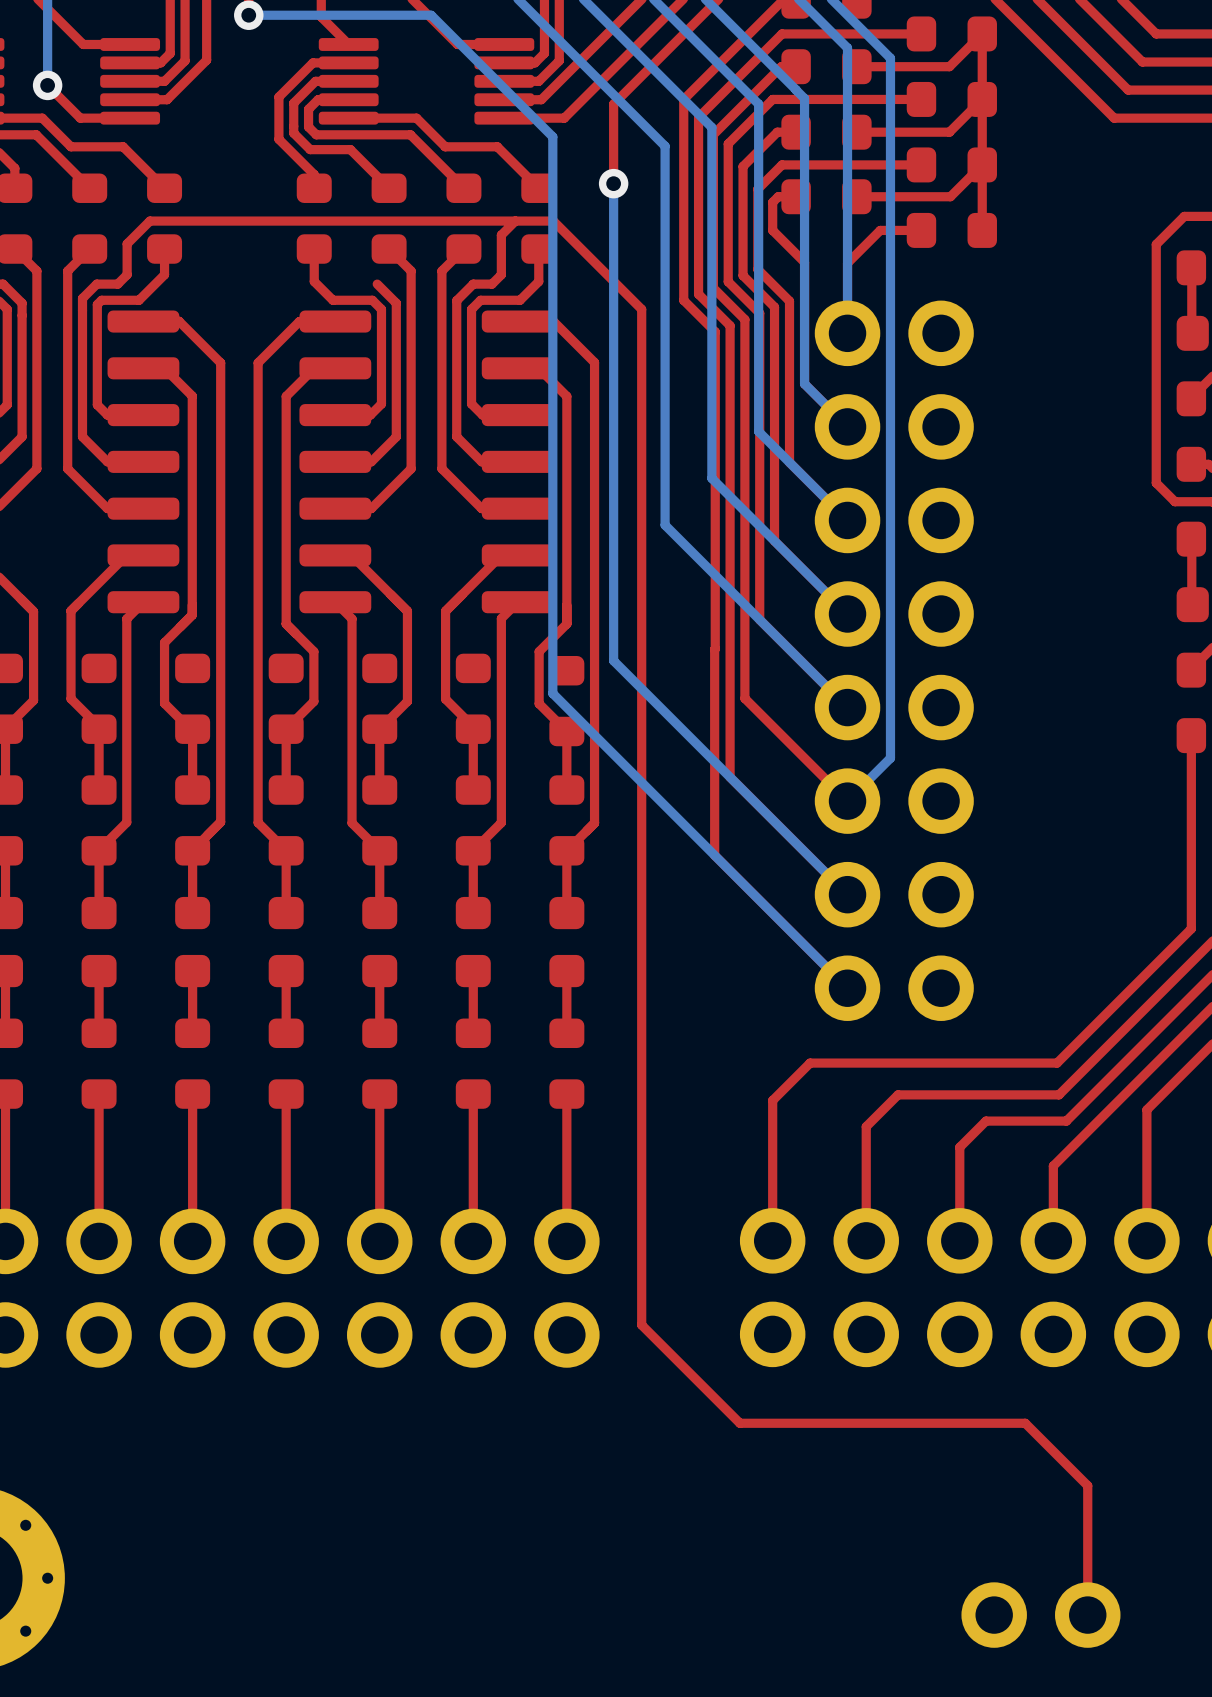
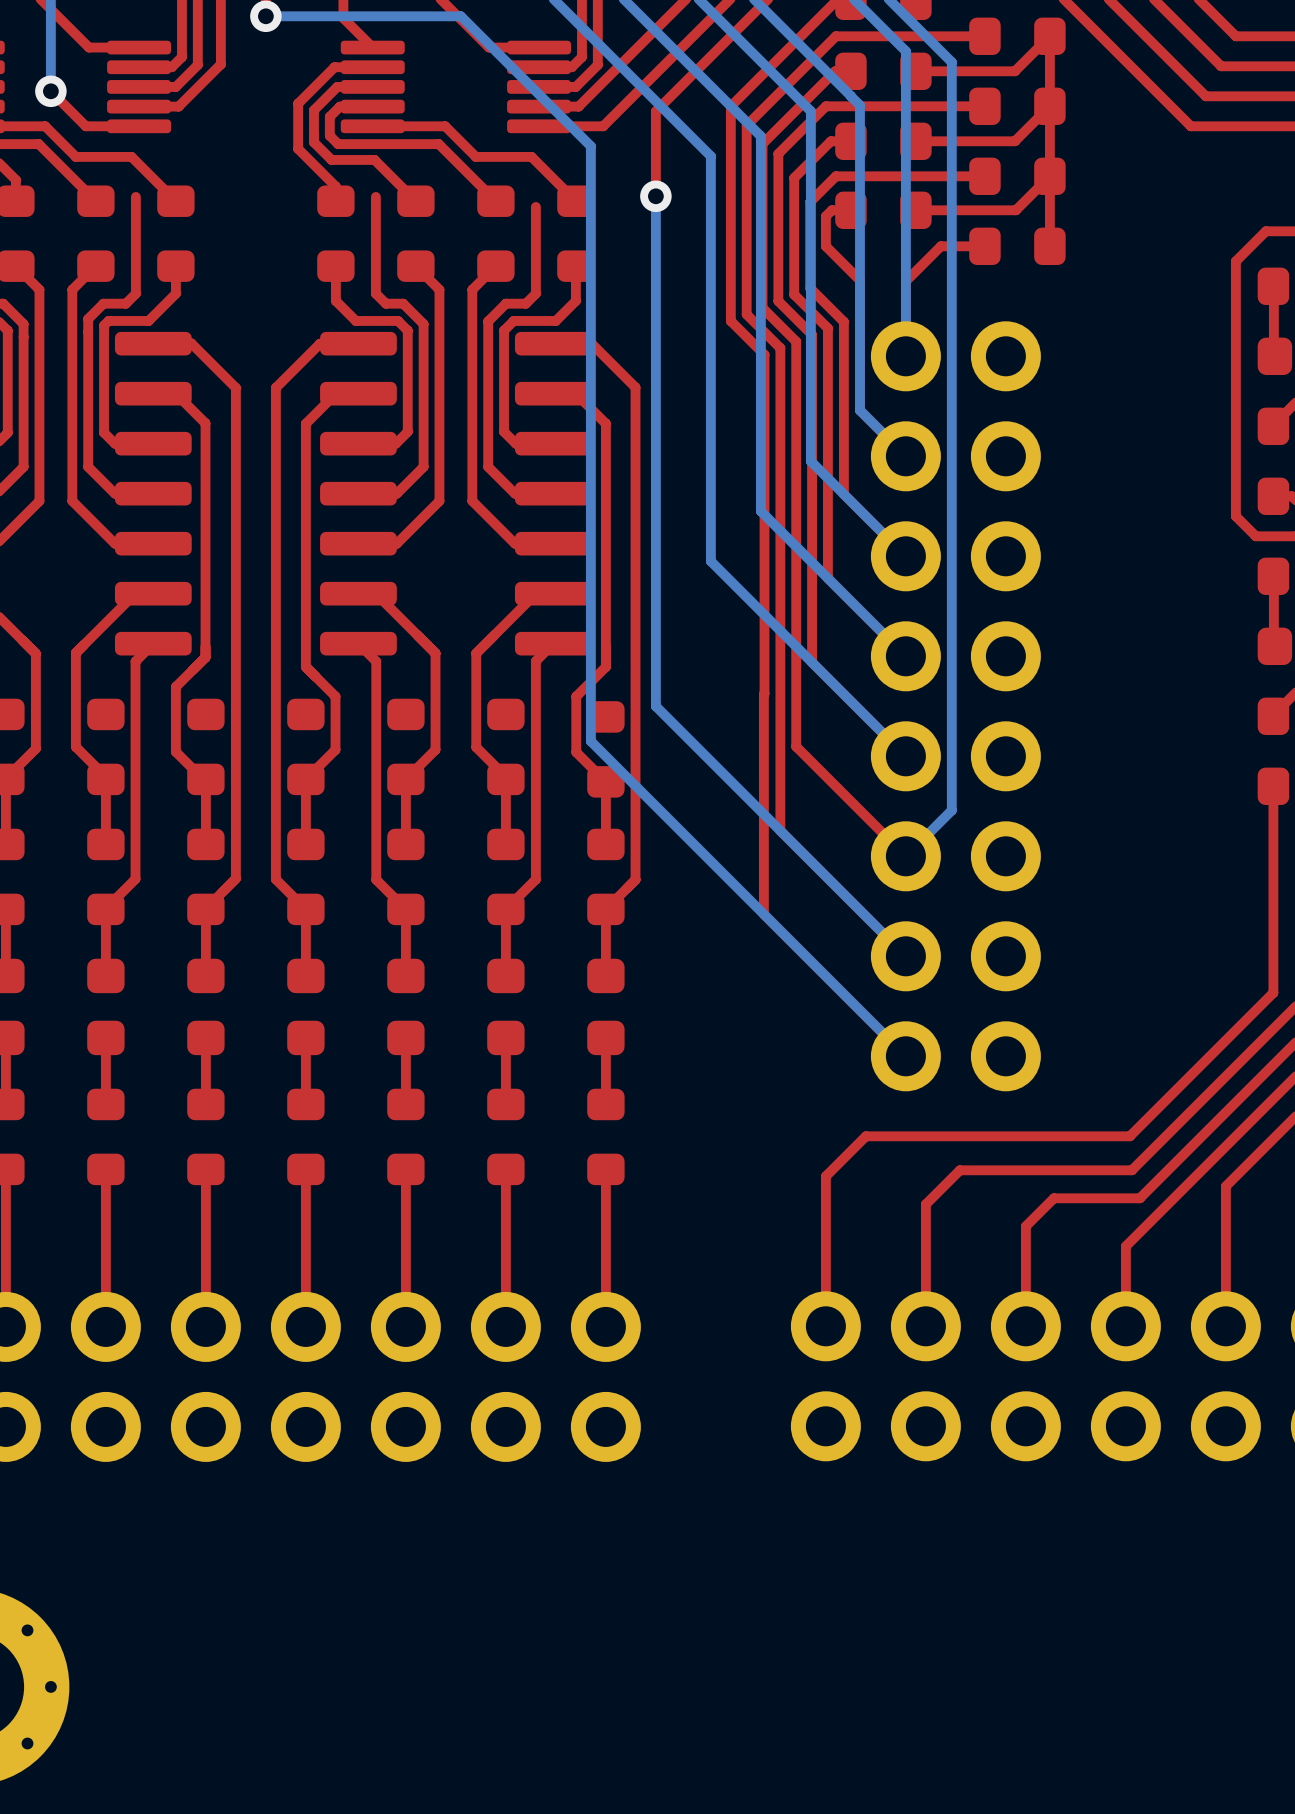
top track: none -> (375, 196) (375, 293) (385, 303) (403, 303)
top track: (515, 221) (501, 235) -> (535, 206) (535, 251)
top track: (127, 243) (149, 221) (553, 221) (641, 309) (641, 1325) (739, 1423) (1025, 1423) (1087, 1485) (1087, 1615) -> (135, 260) (135, 196)
part: (1040, 1615) -> none

